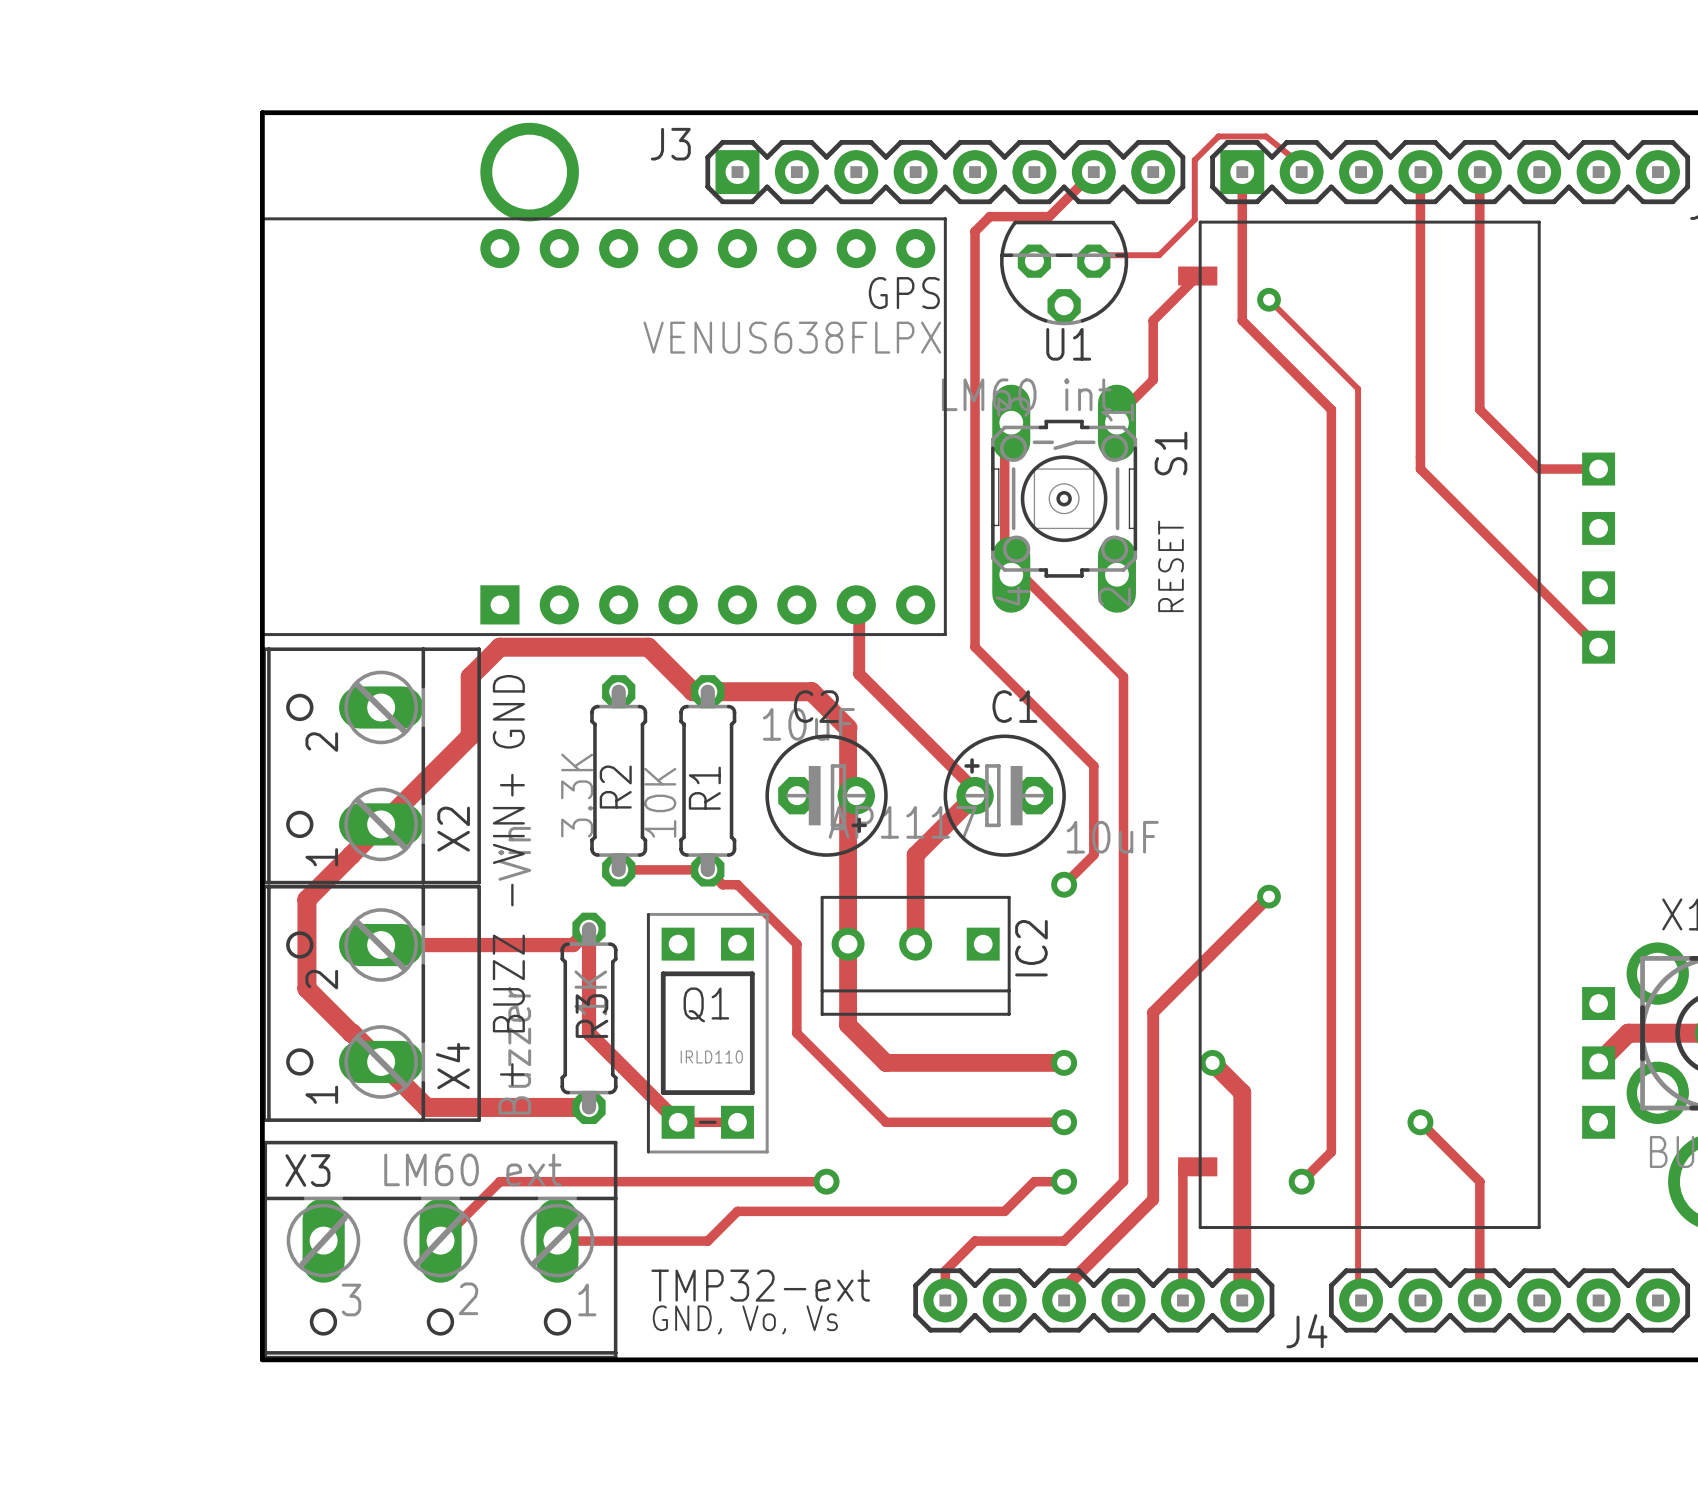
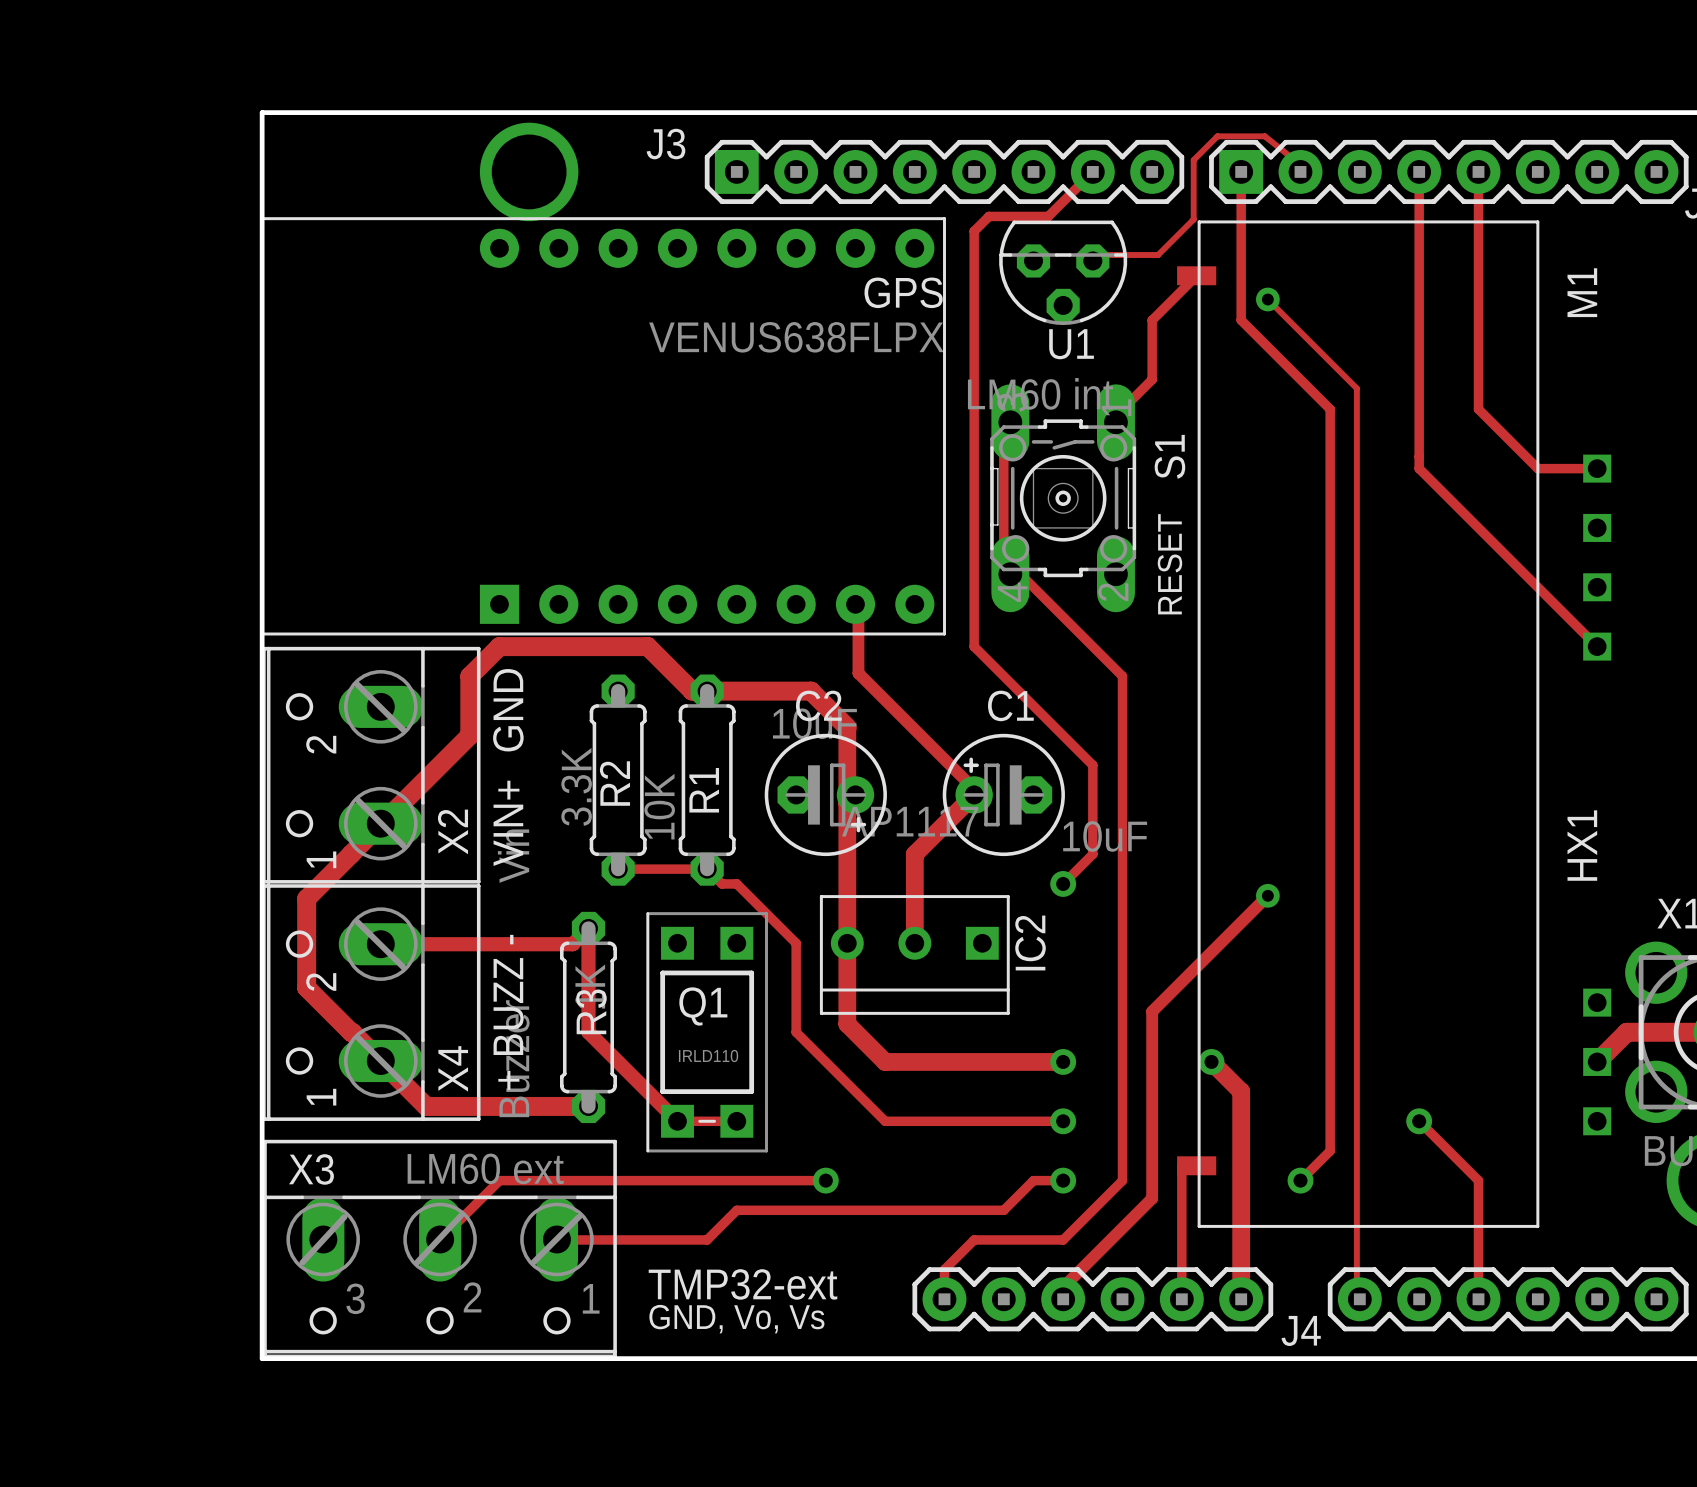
M1: none -> HX1 (1394, 724)
part: (1396, 724) -> none

